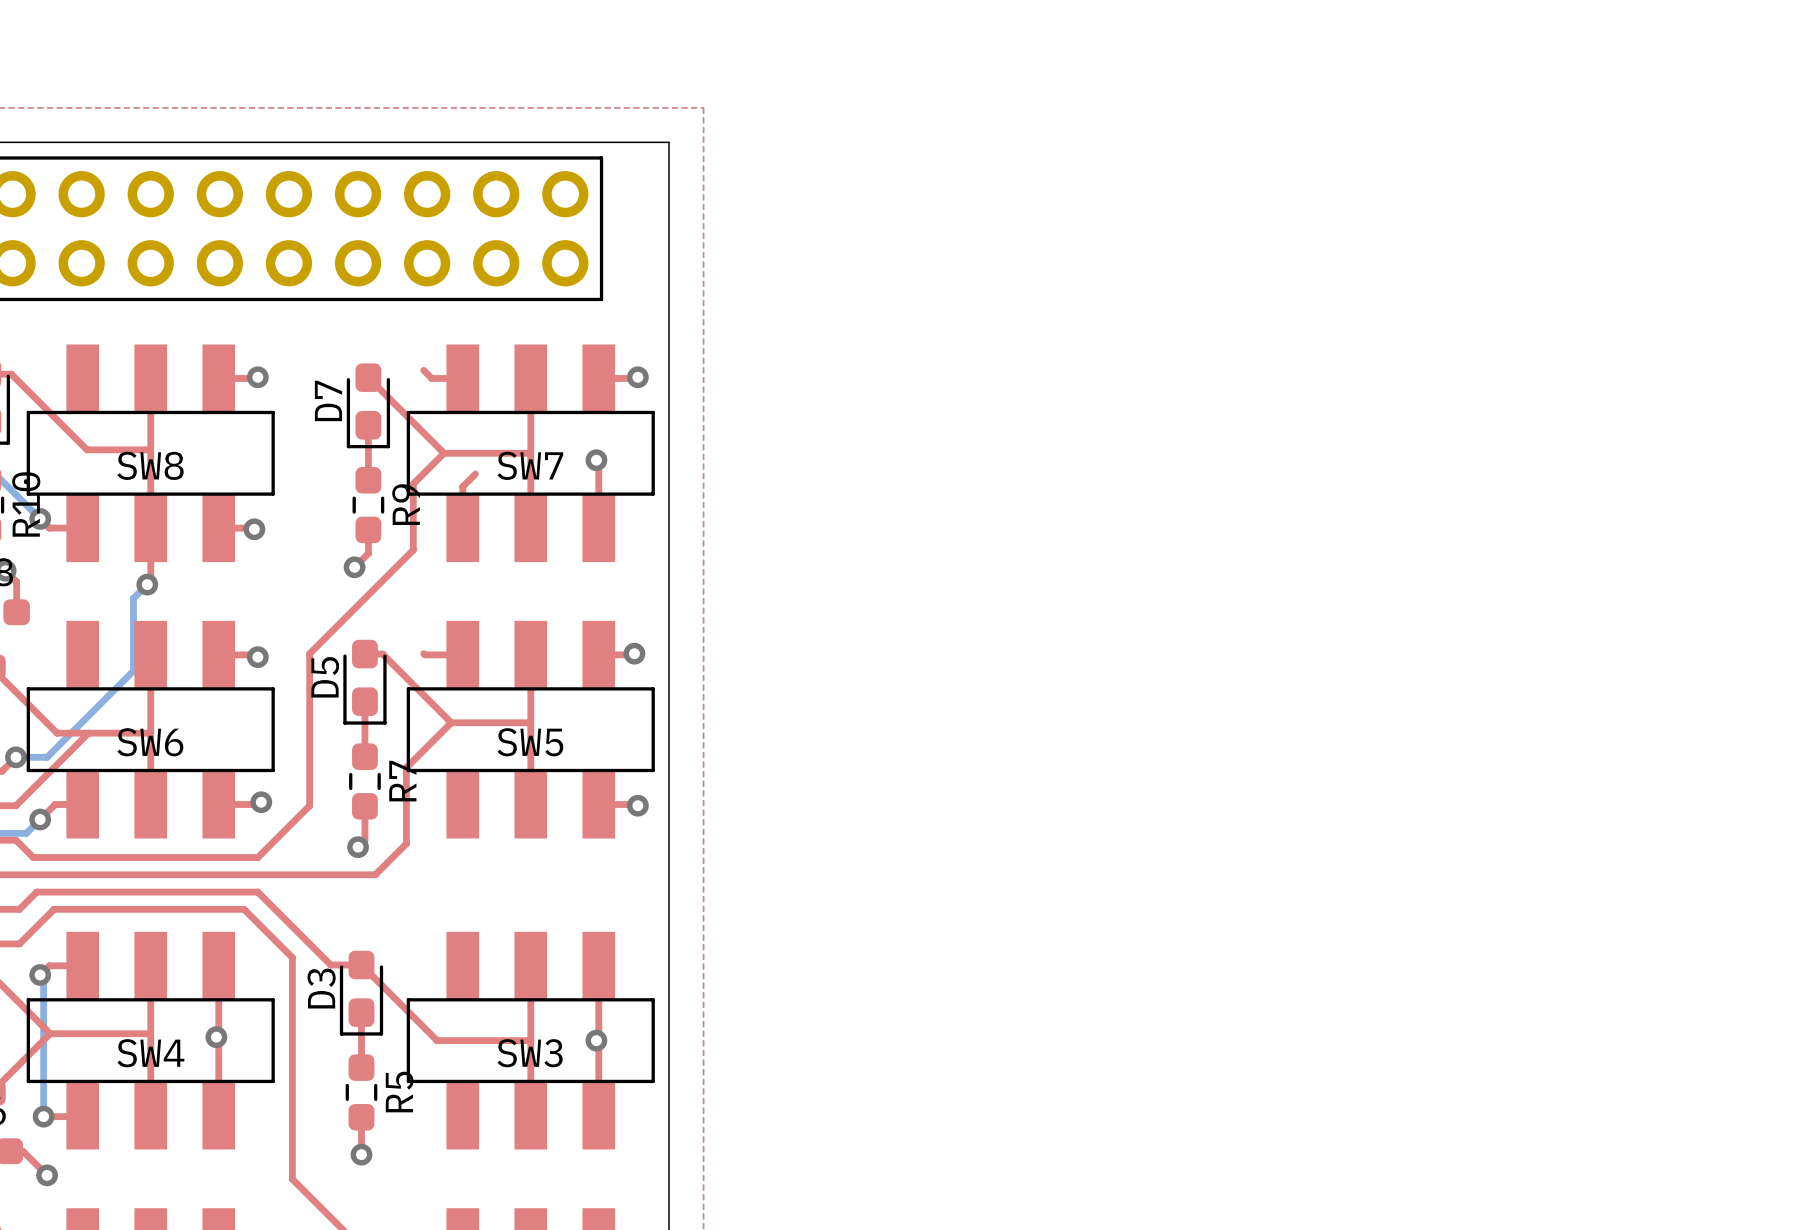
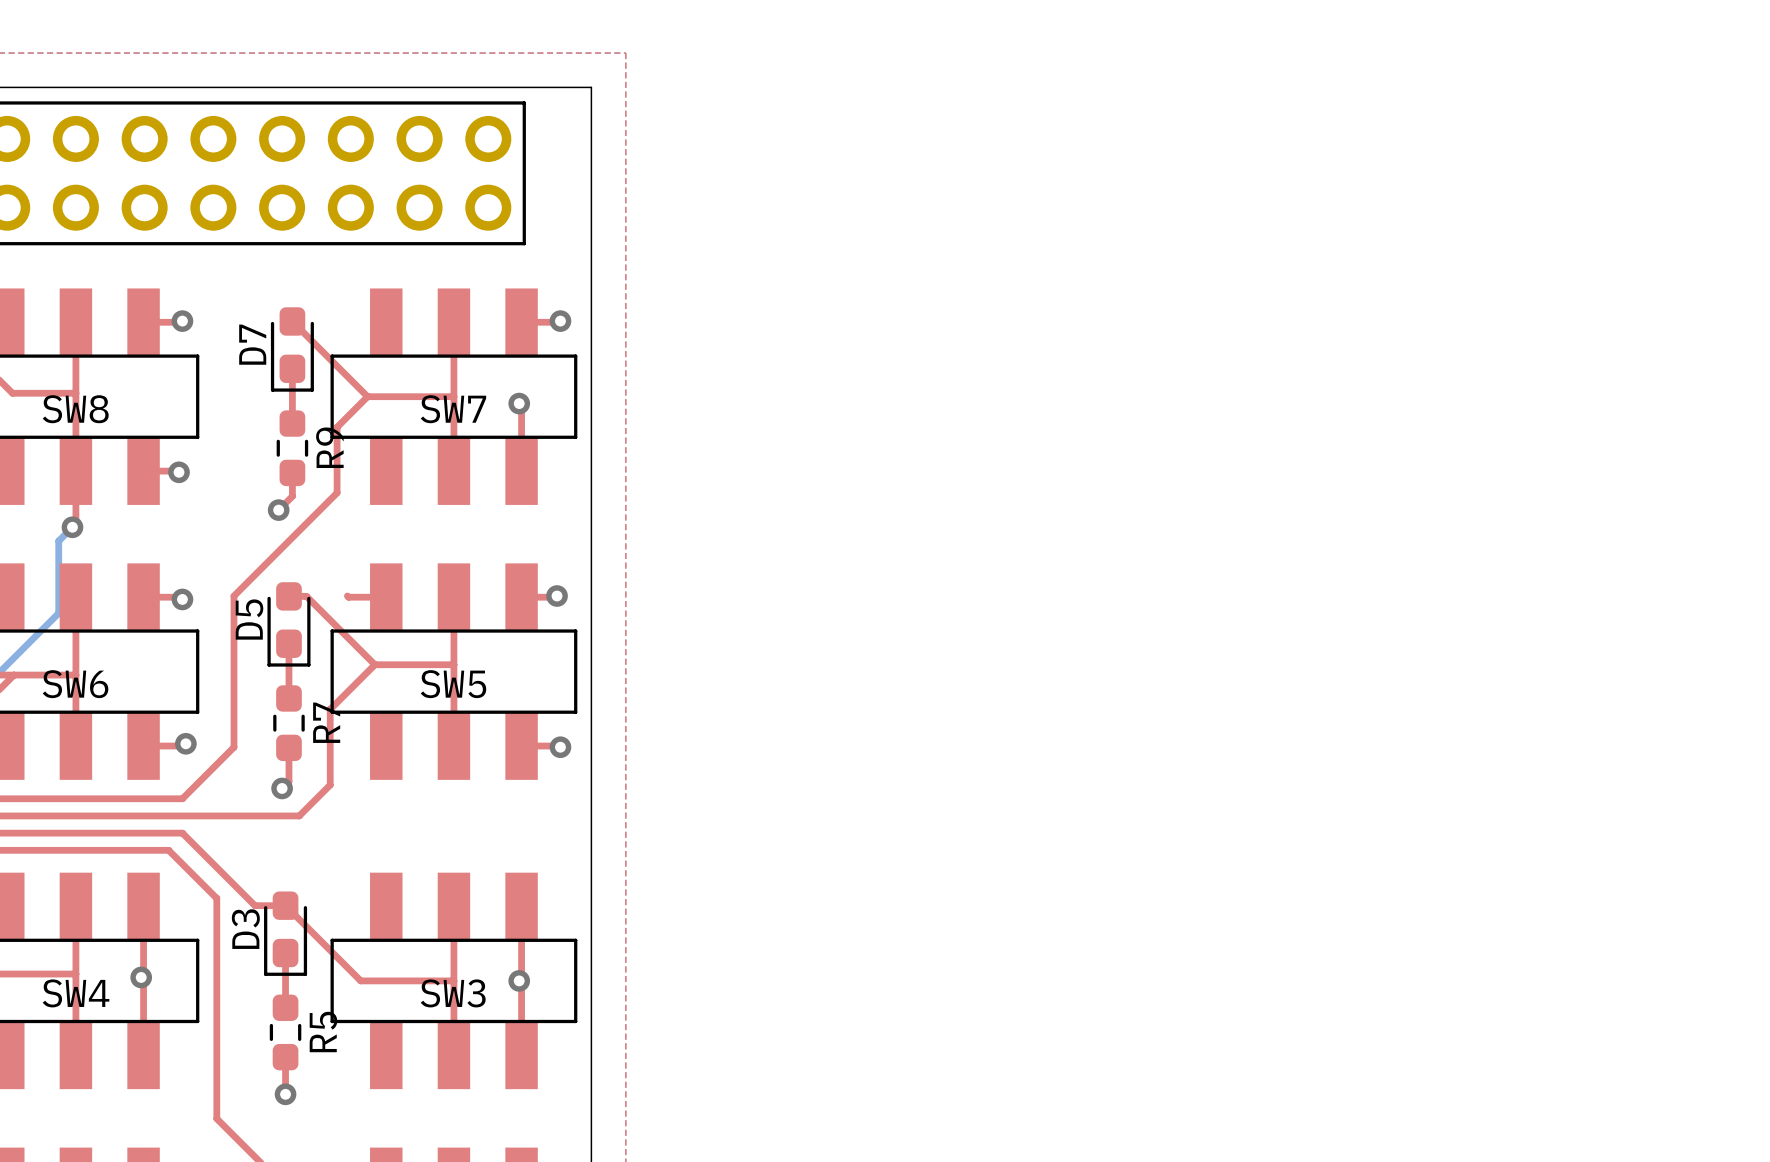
top track: (423, 370) (431, 378) (462, 378) -> none
top track: (475, 474) (462, 486) (462, 528) -> none

